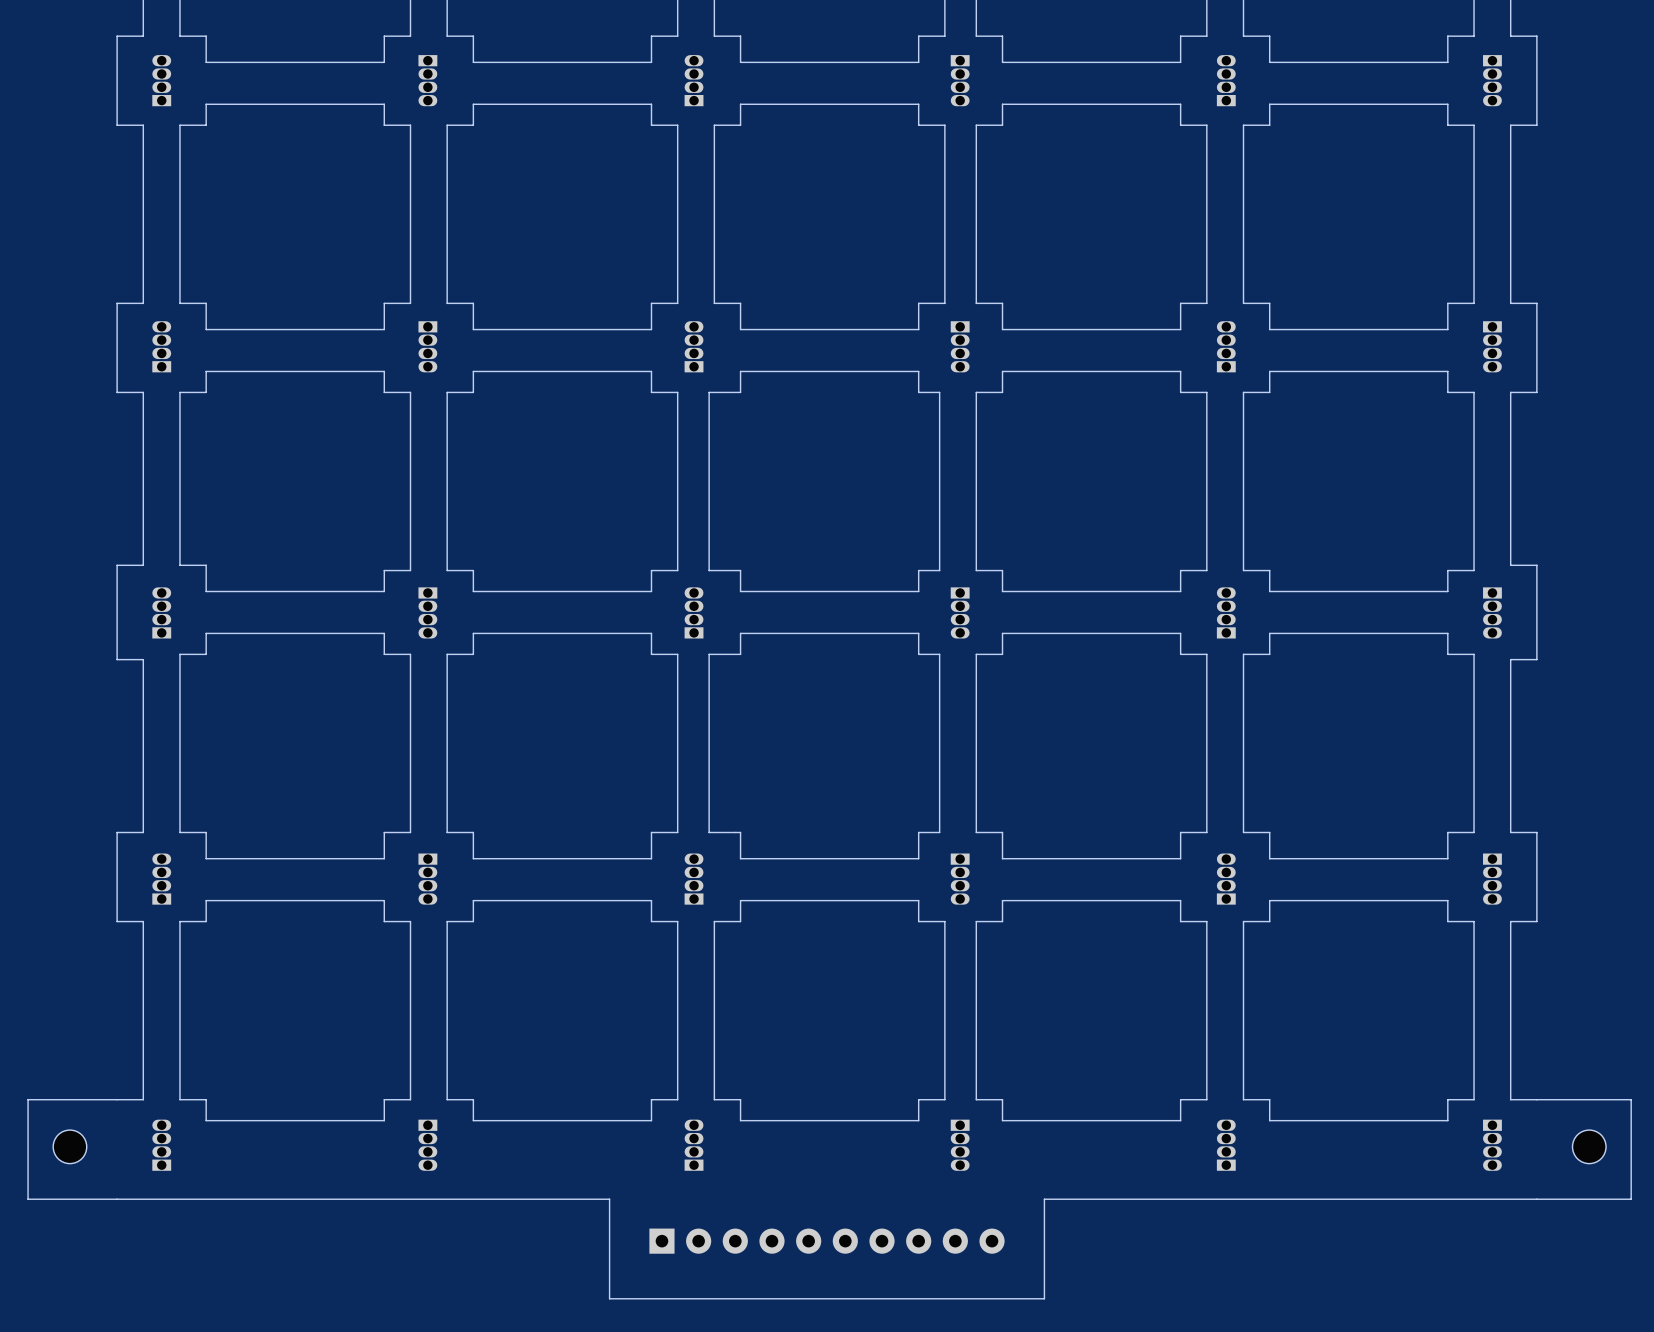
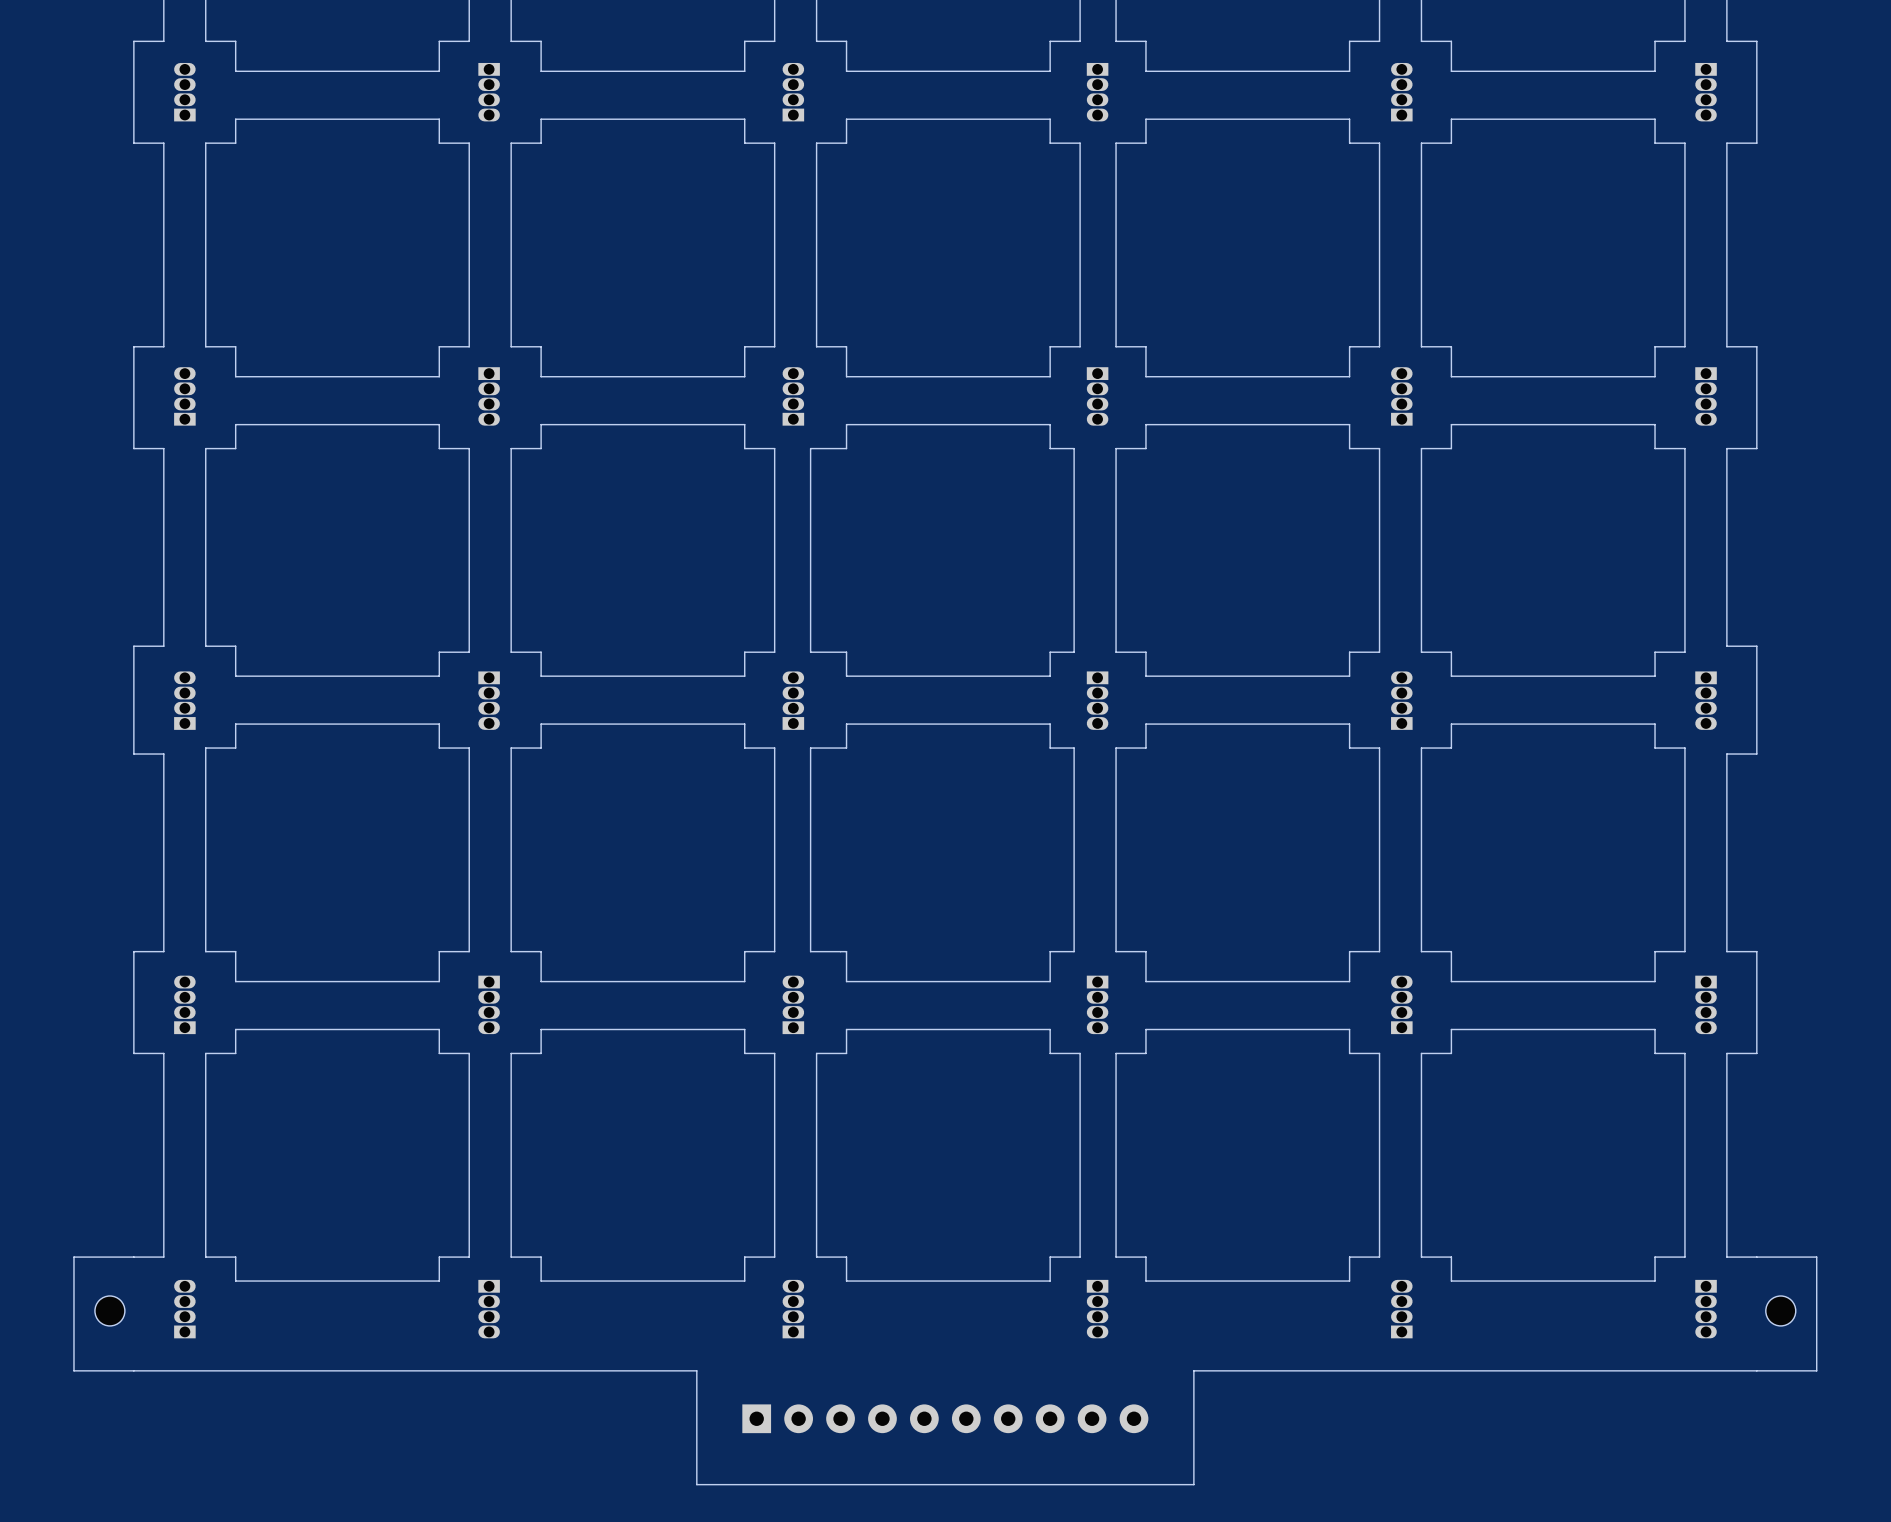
board edge: (64, 1099) (28, 1099) (28, 1199) (64, 1199) -> (73, 1257) (73, 1370)
board edge: (1589, 1099) (1631, 1099) (1631, 1199) (1589, 1199) -> (1816, 1257) (1816, 1370)
part: (69, 1146) -> none
part: none -> (109, 1310)
part: none -> (1780, 1310)
part: (1589, 1146) -> none

